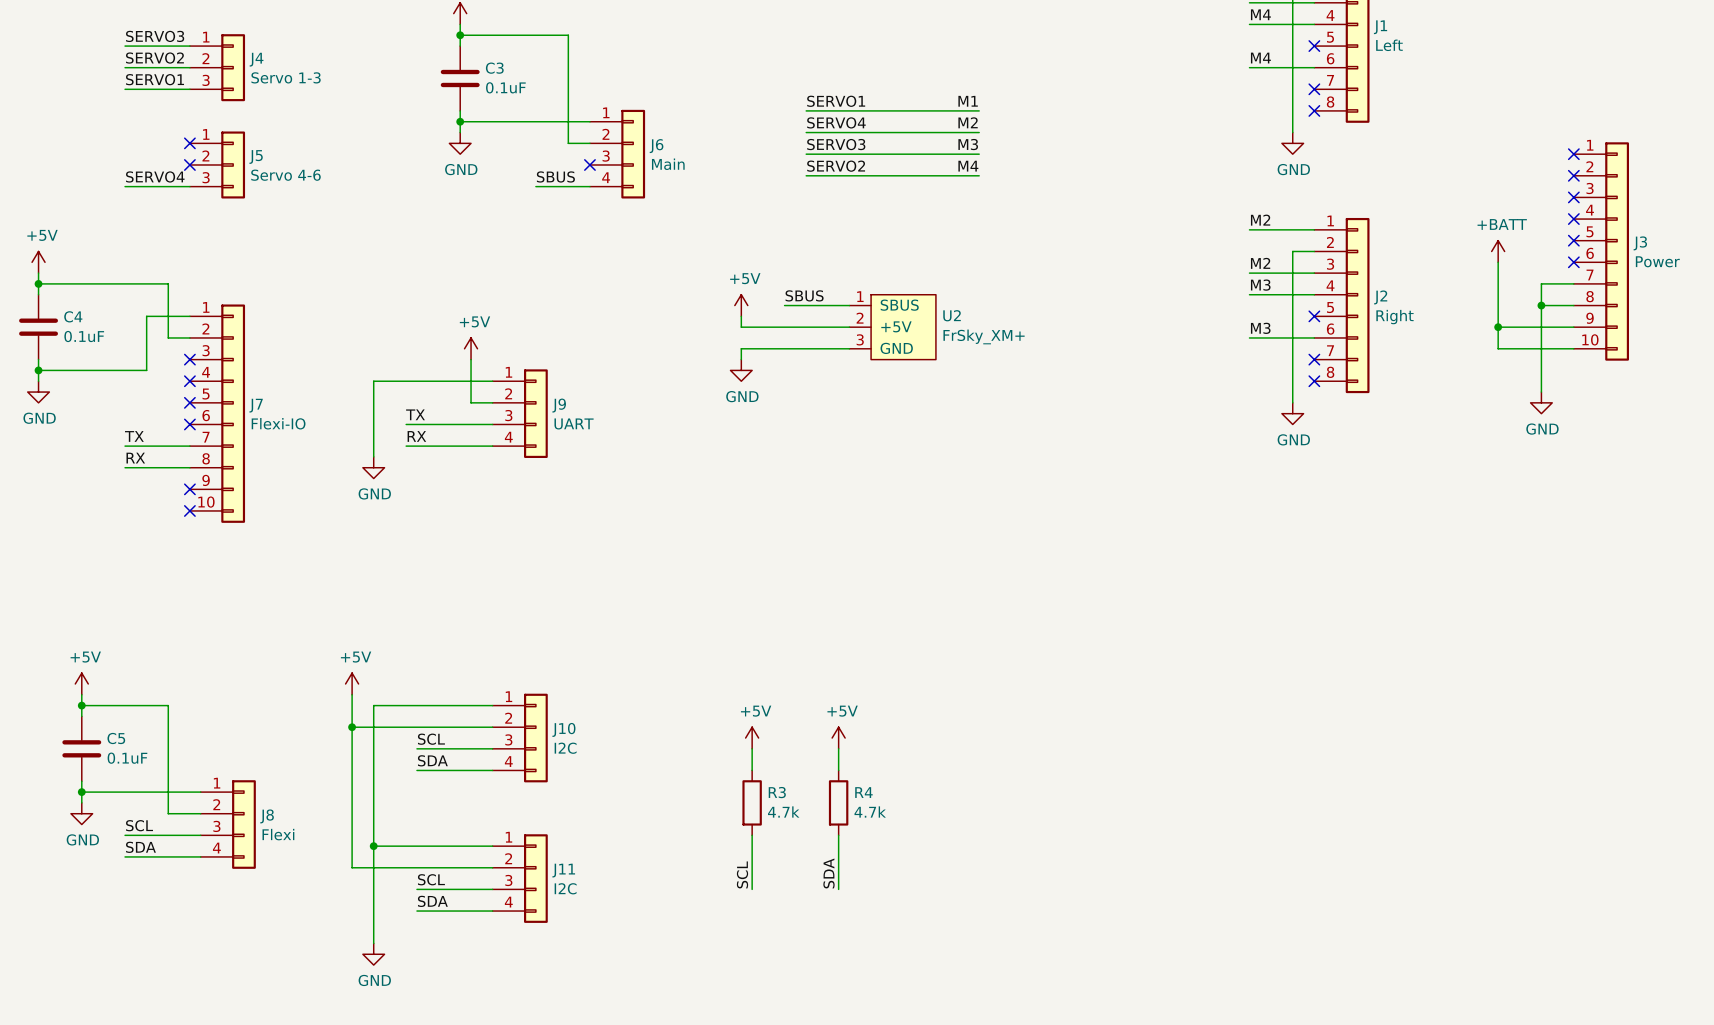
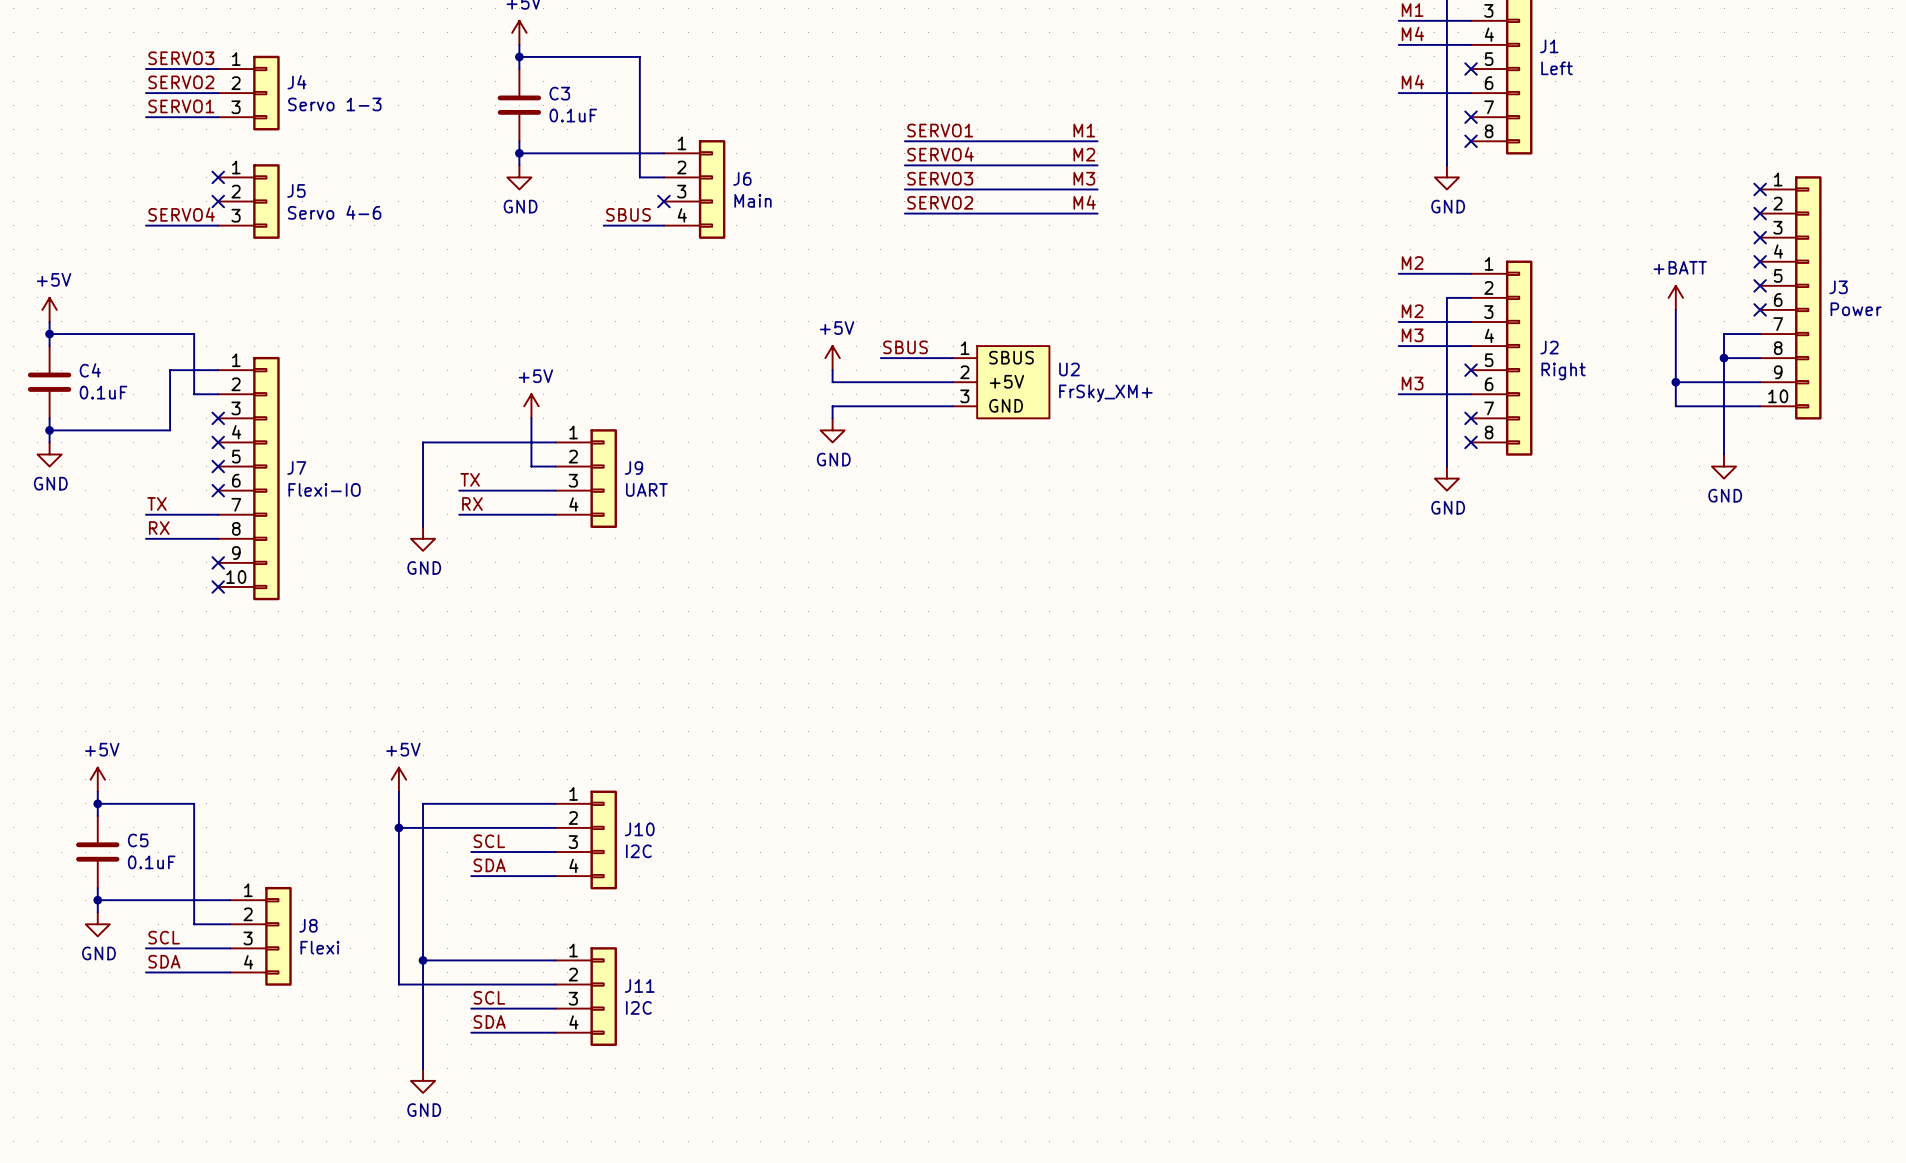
power symbol: +5V (752, 738) -> none
power symbol: +5V (838, 738) -> none
wire: (752, 748) (752, 770) -> none
wire: (838, 748) (838, 770) -> none
R3: 4.7k (752, 802) -> none
R4: 4.7k (838, 802) -> none
wire: (752, 835) (752, 889) -> none
wire: (838, 835) (838, 889) -> none
label: SDA (828, 873) -> none
label: SCL (742, 874) -> none

